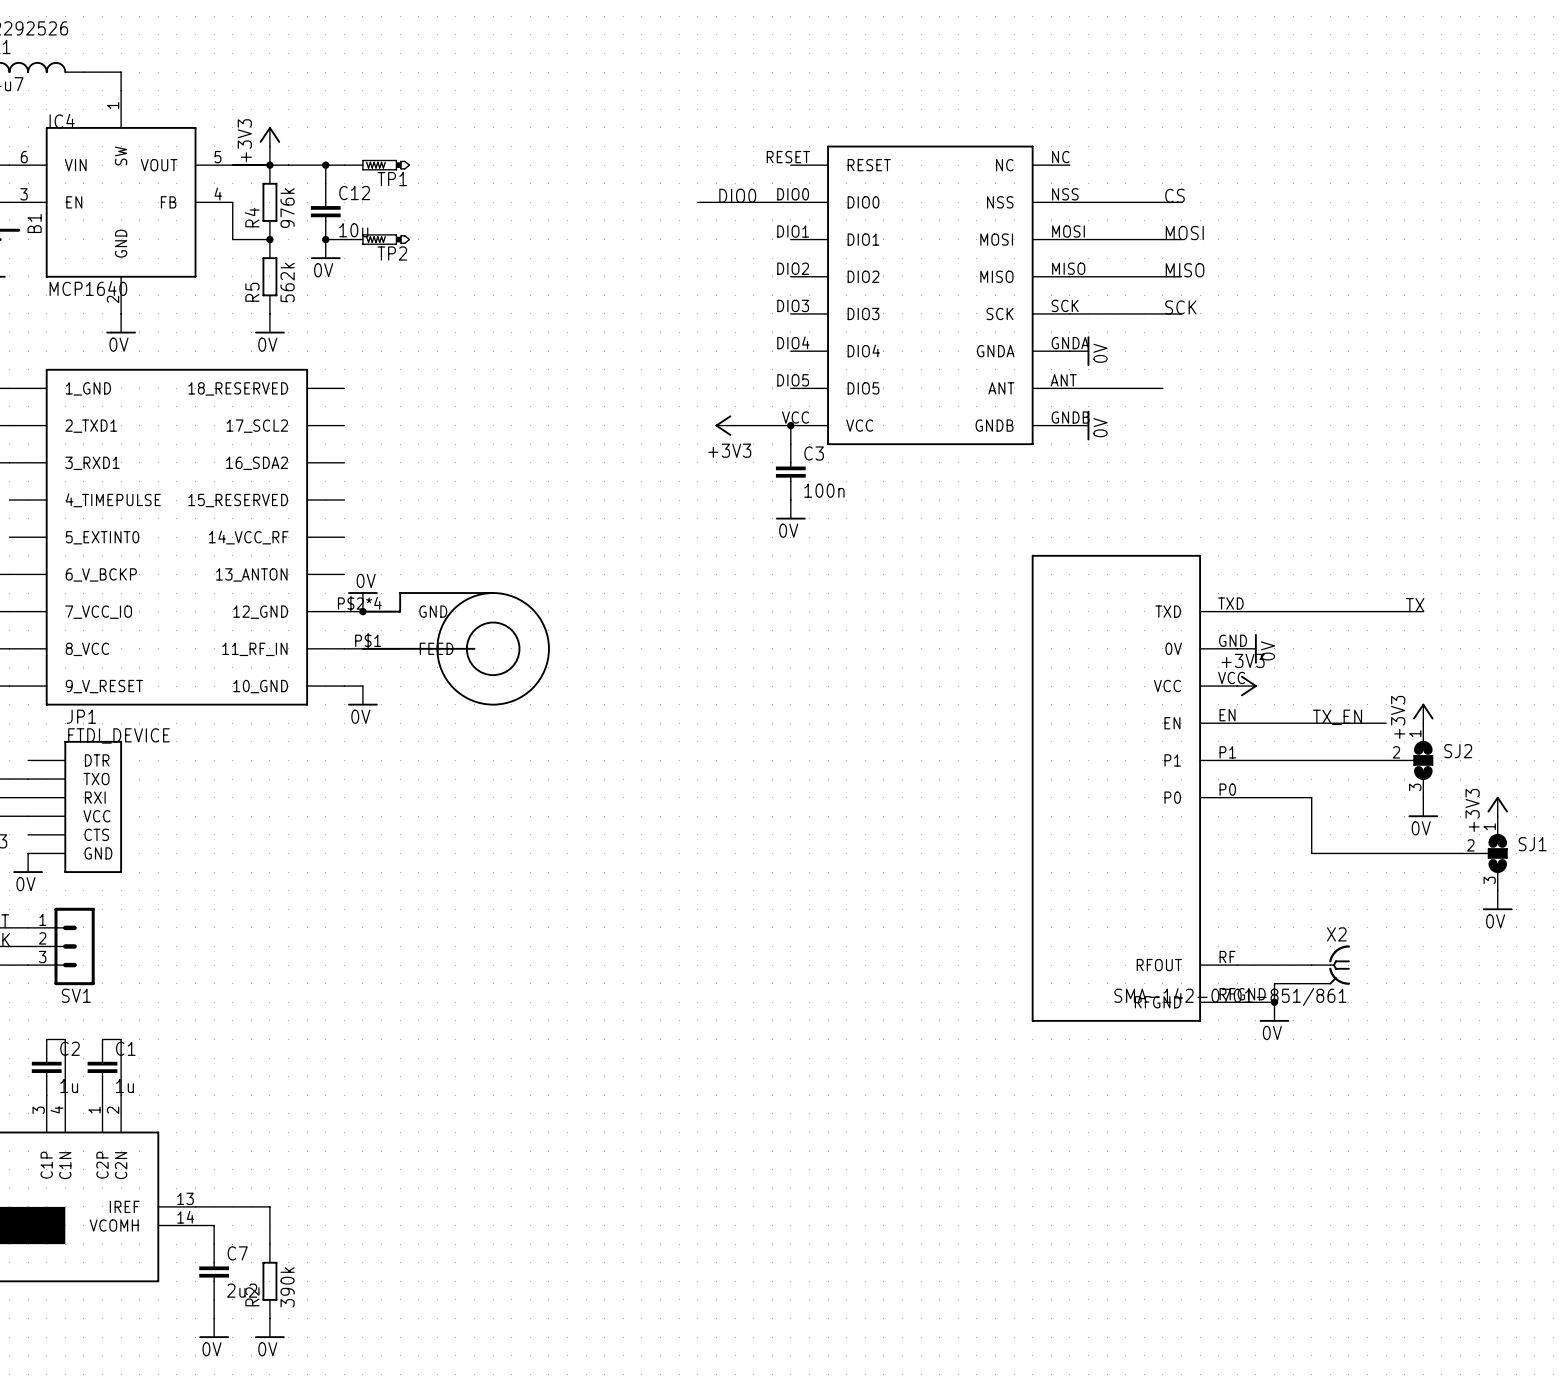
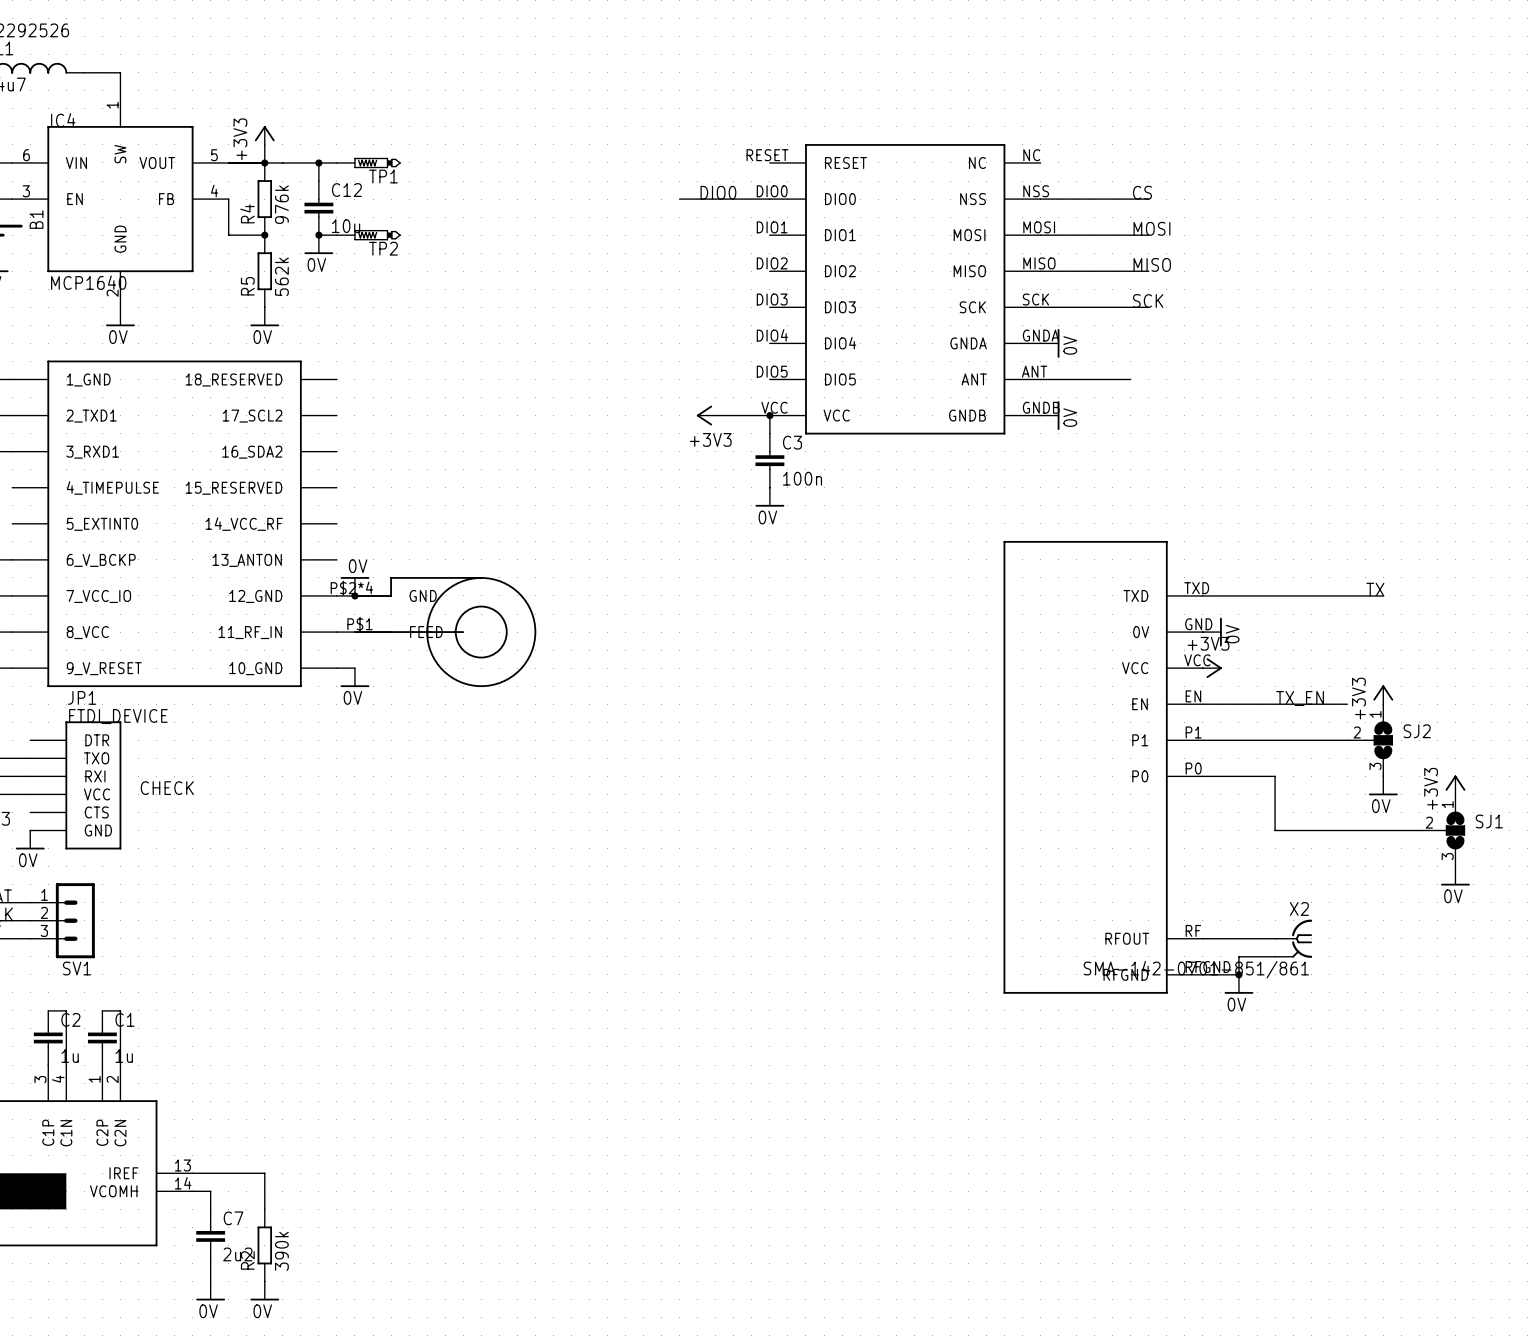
text: none -> CHECK (167, 788)

